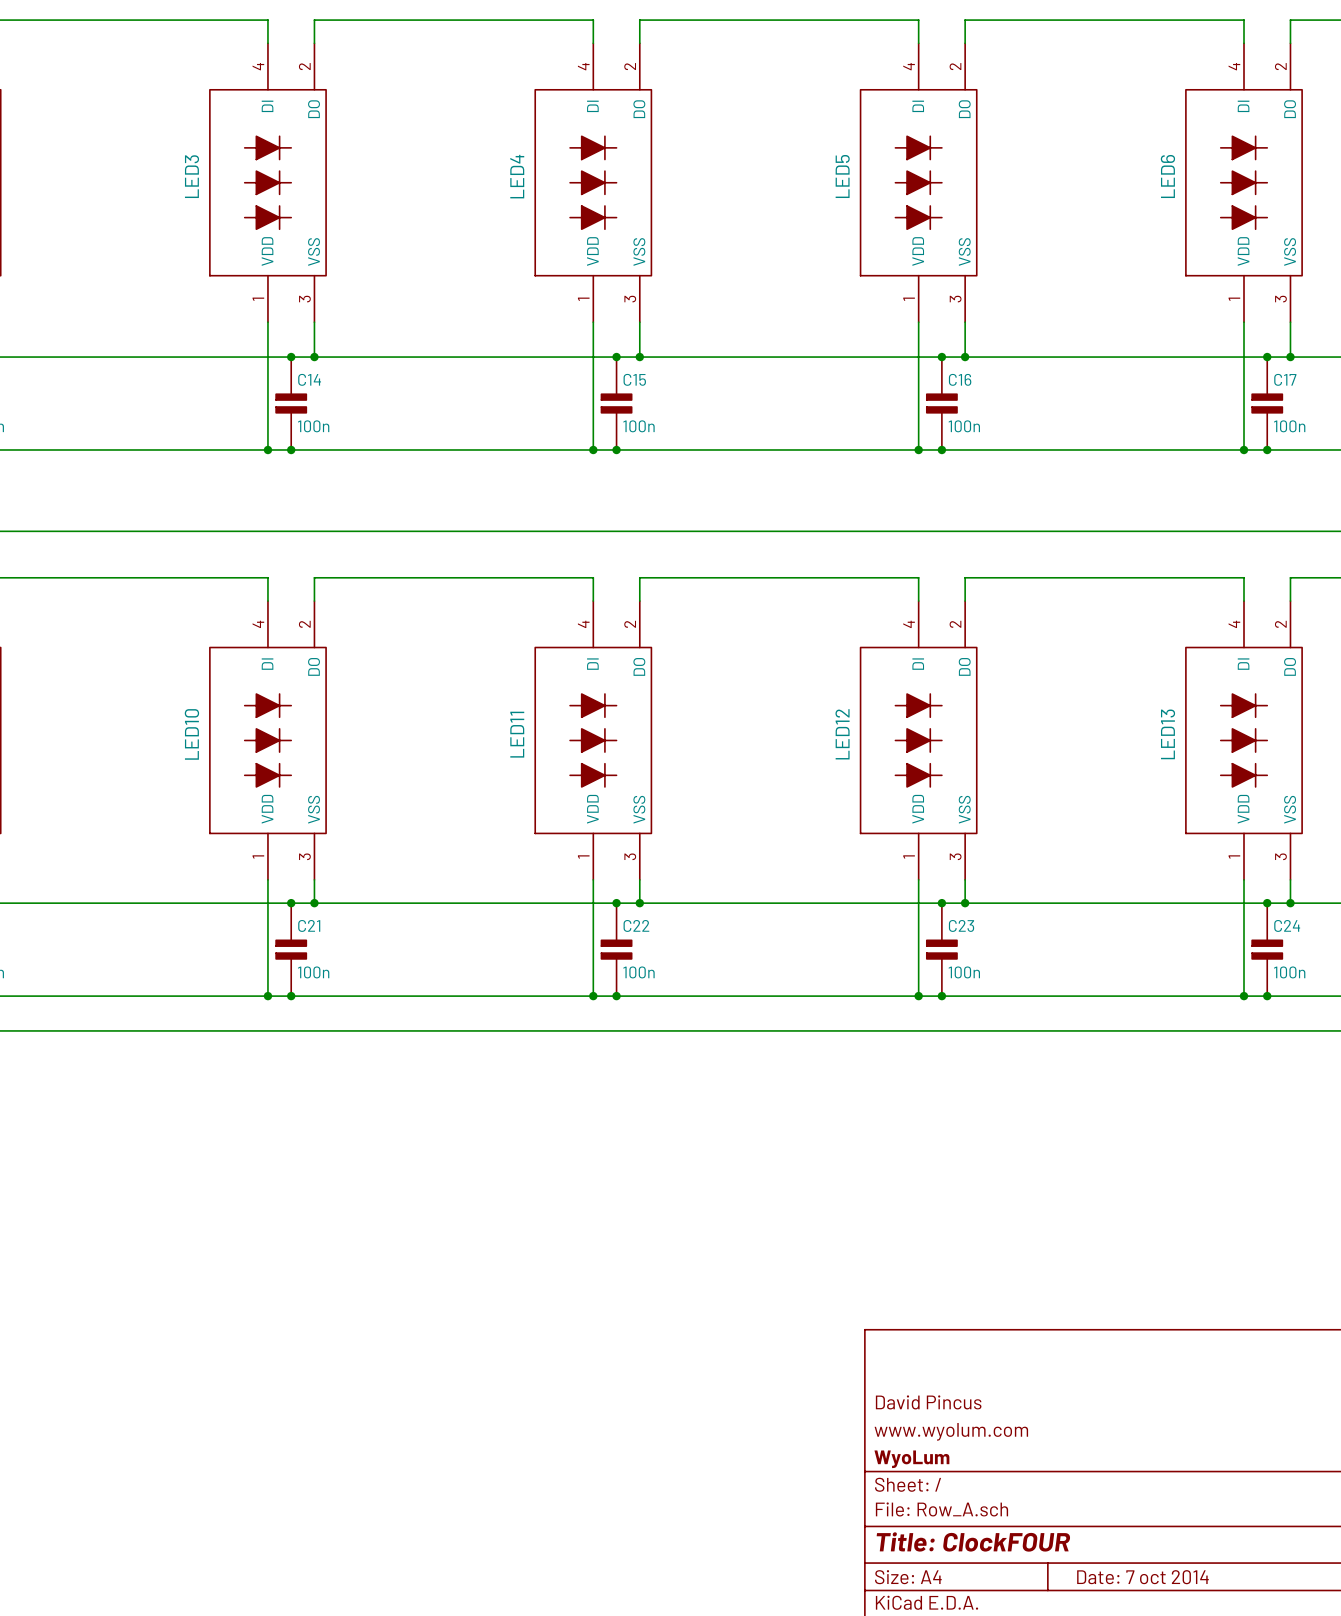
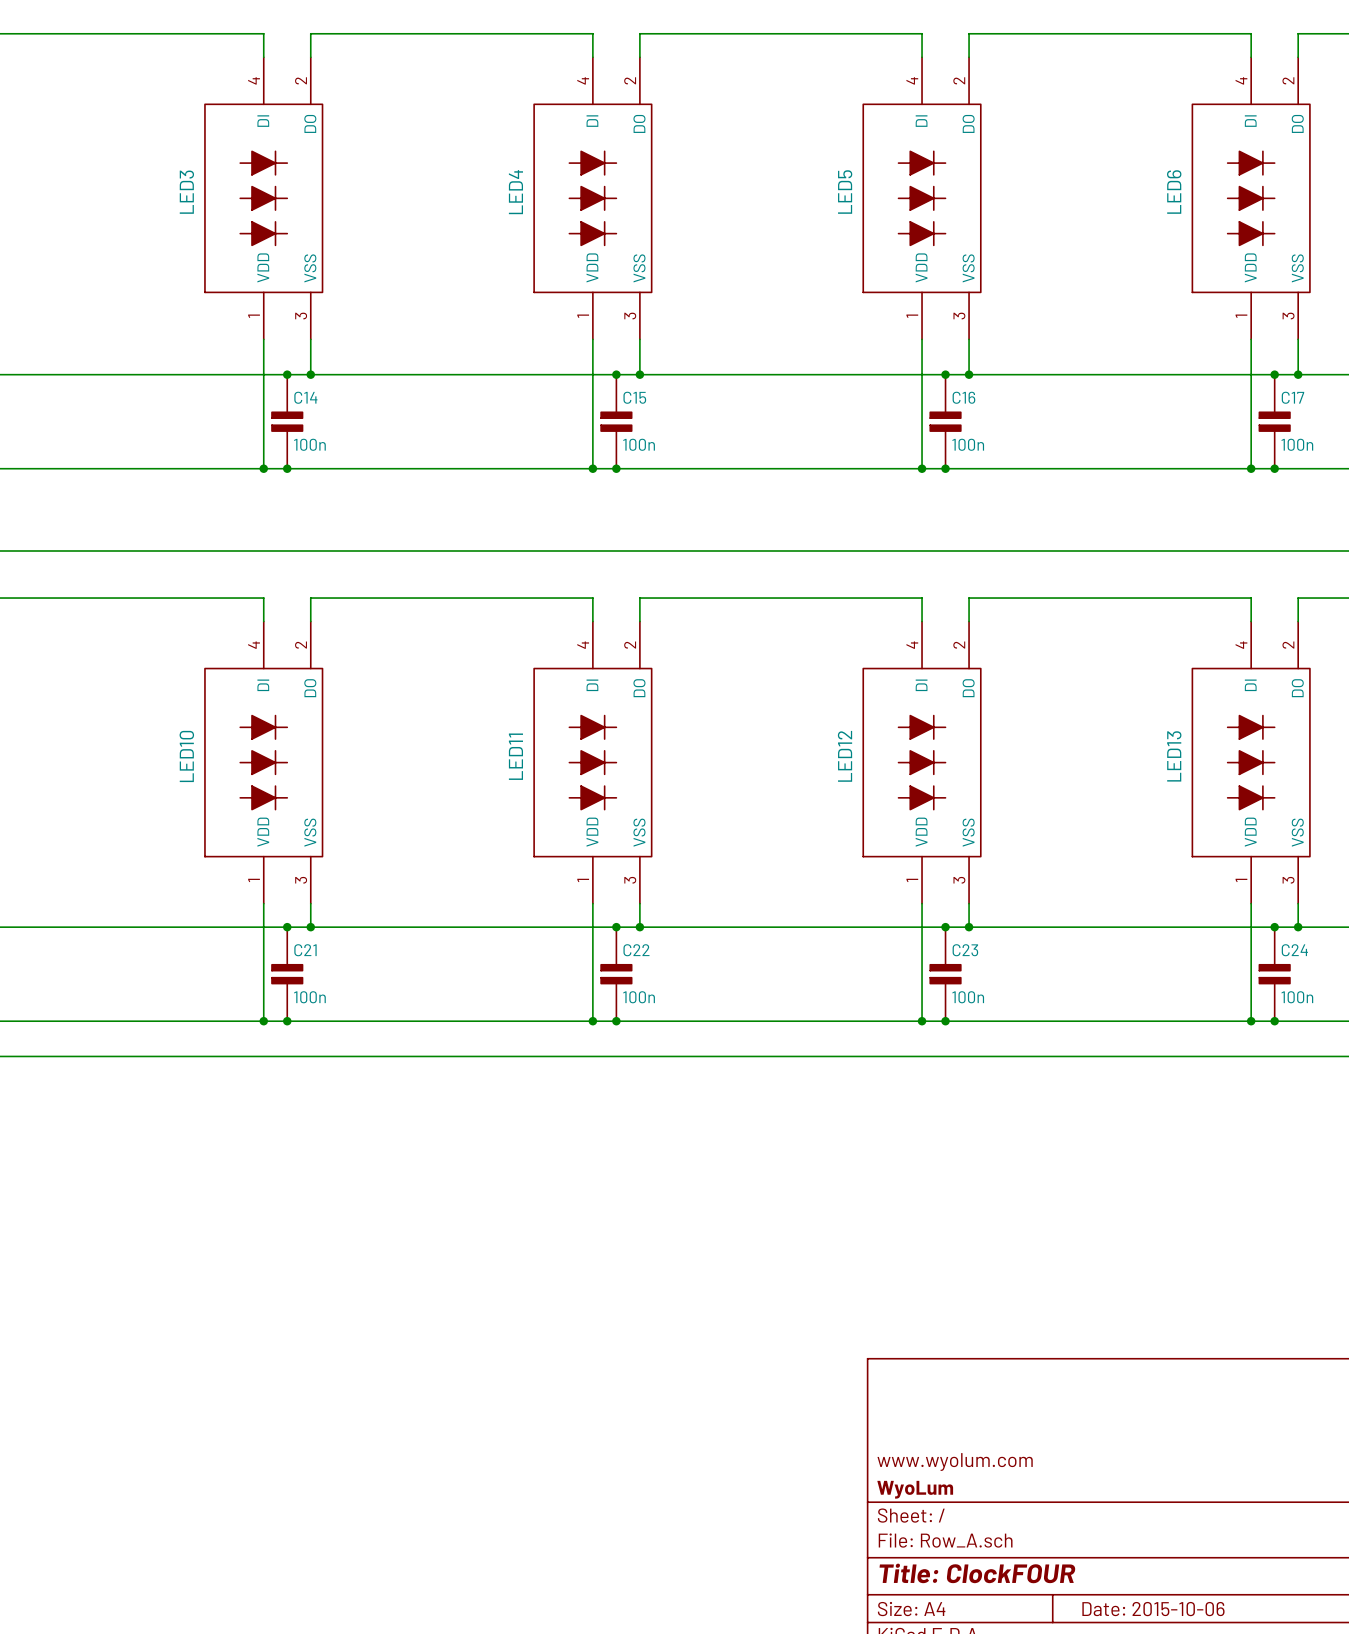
title block: David Pincus (928, 1402) -> none
title block: Date: 7 oct 2014 (1142, 1577) -> Date: 2015-10-06 (1153, 1609)

